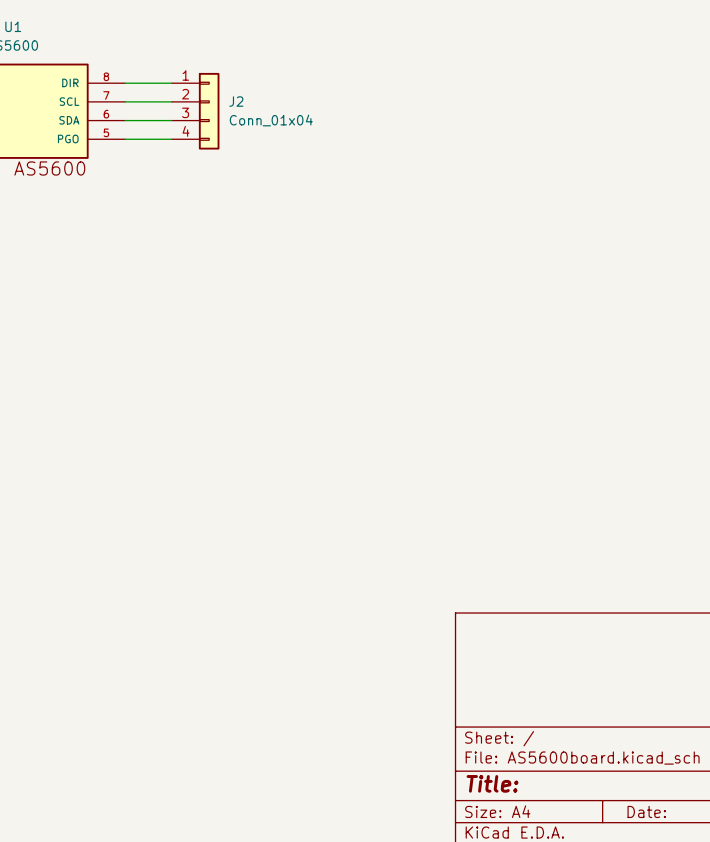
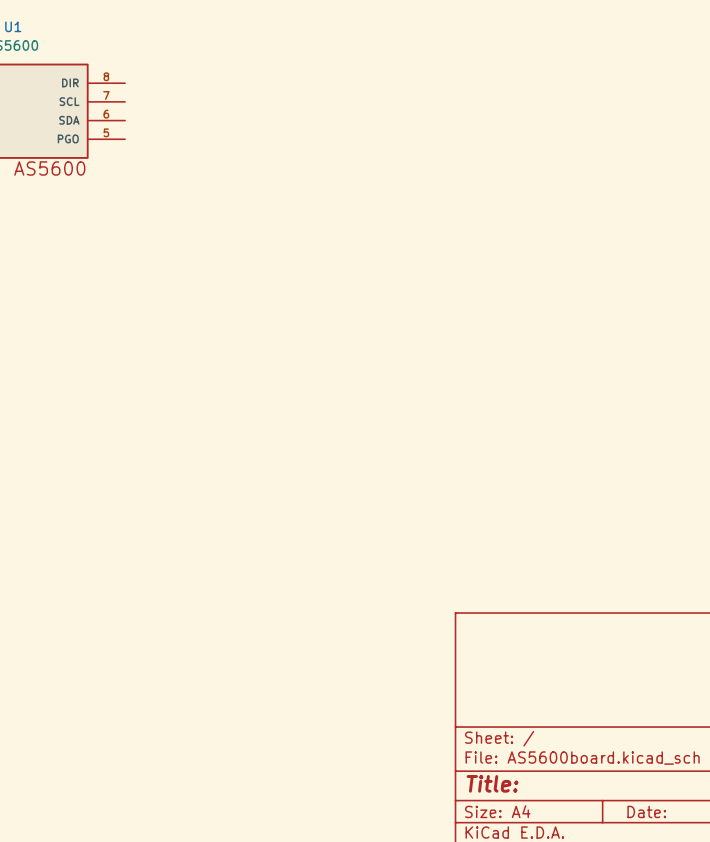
wire: (125, 83) (171, 83) -> none
wire: (125, 101) (171, 101) -> none
J2: Conn_01x04 (195, 111) -> none
wire: (125, 120) (171, 120) -> none
wire: (125, 139) (171, 139) -> none

